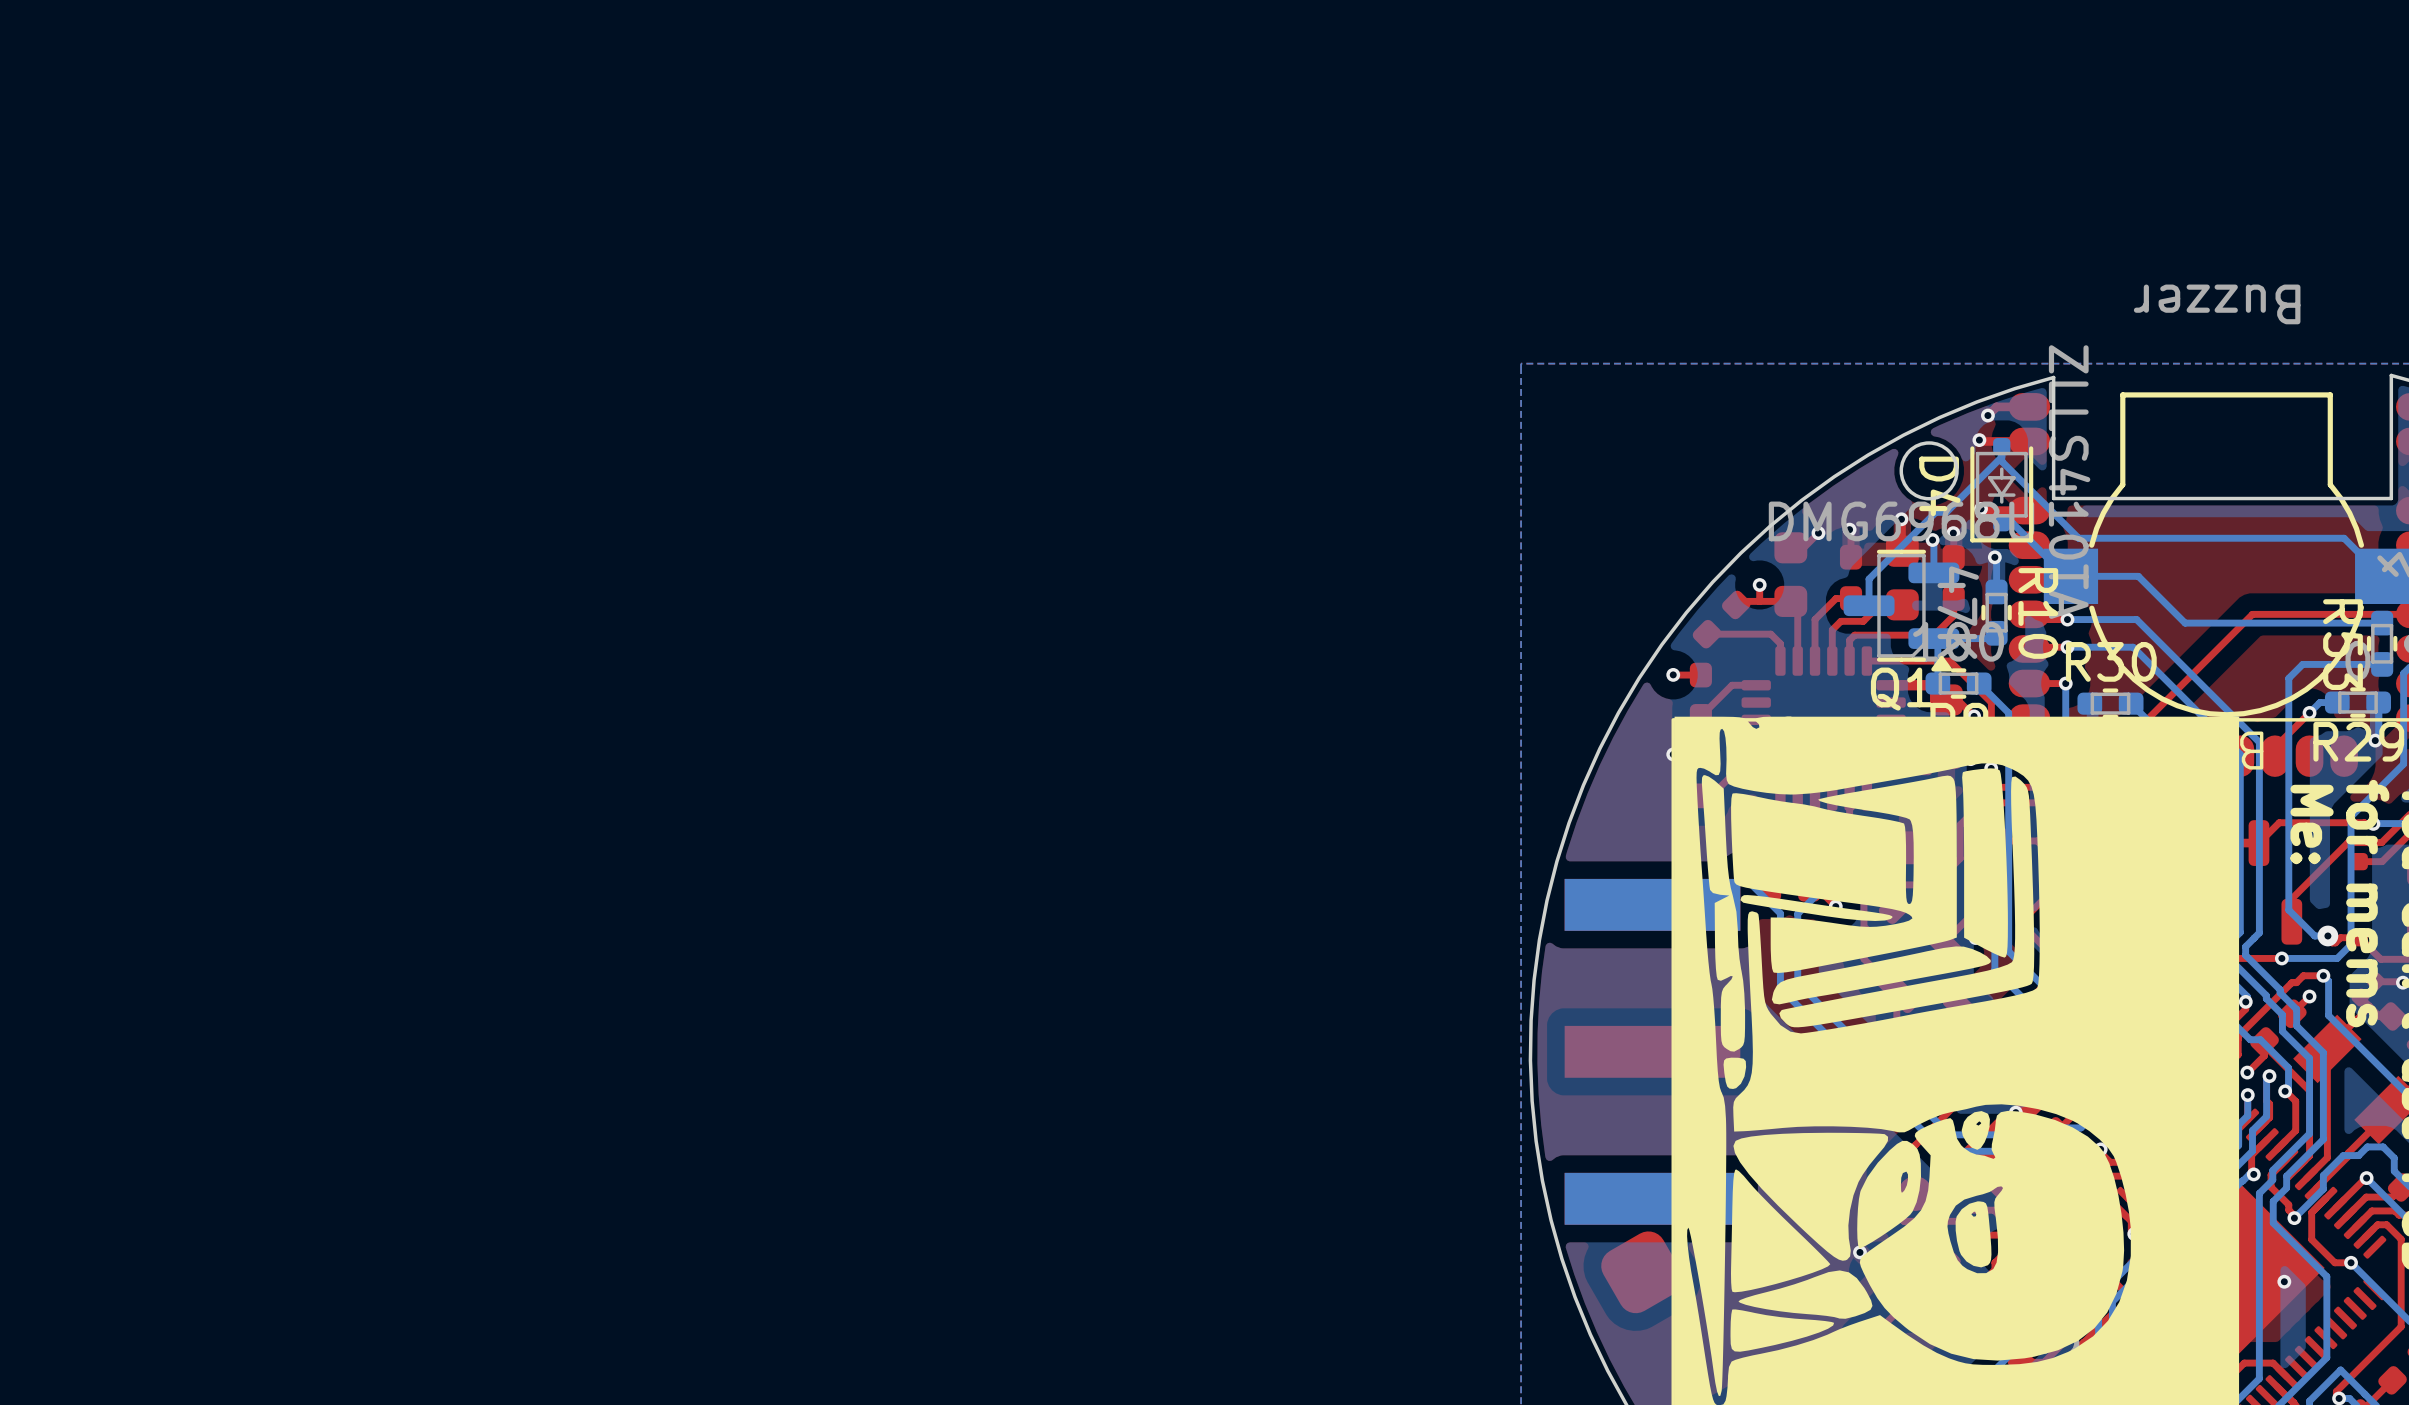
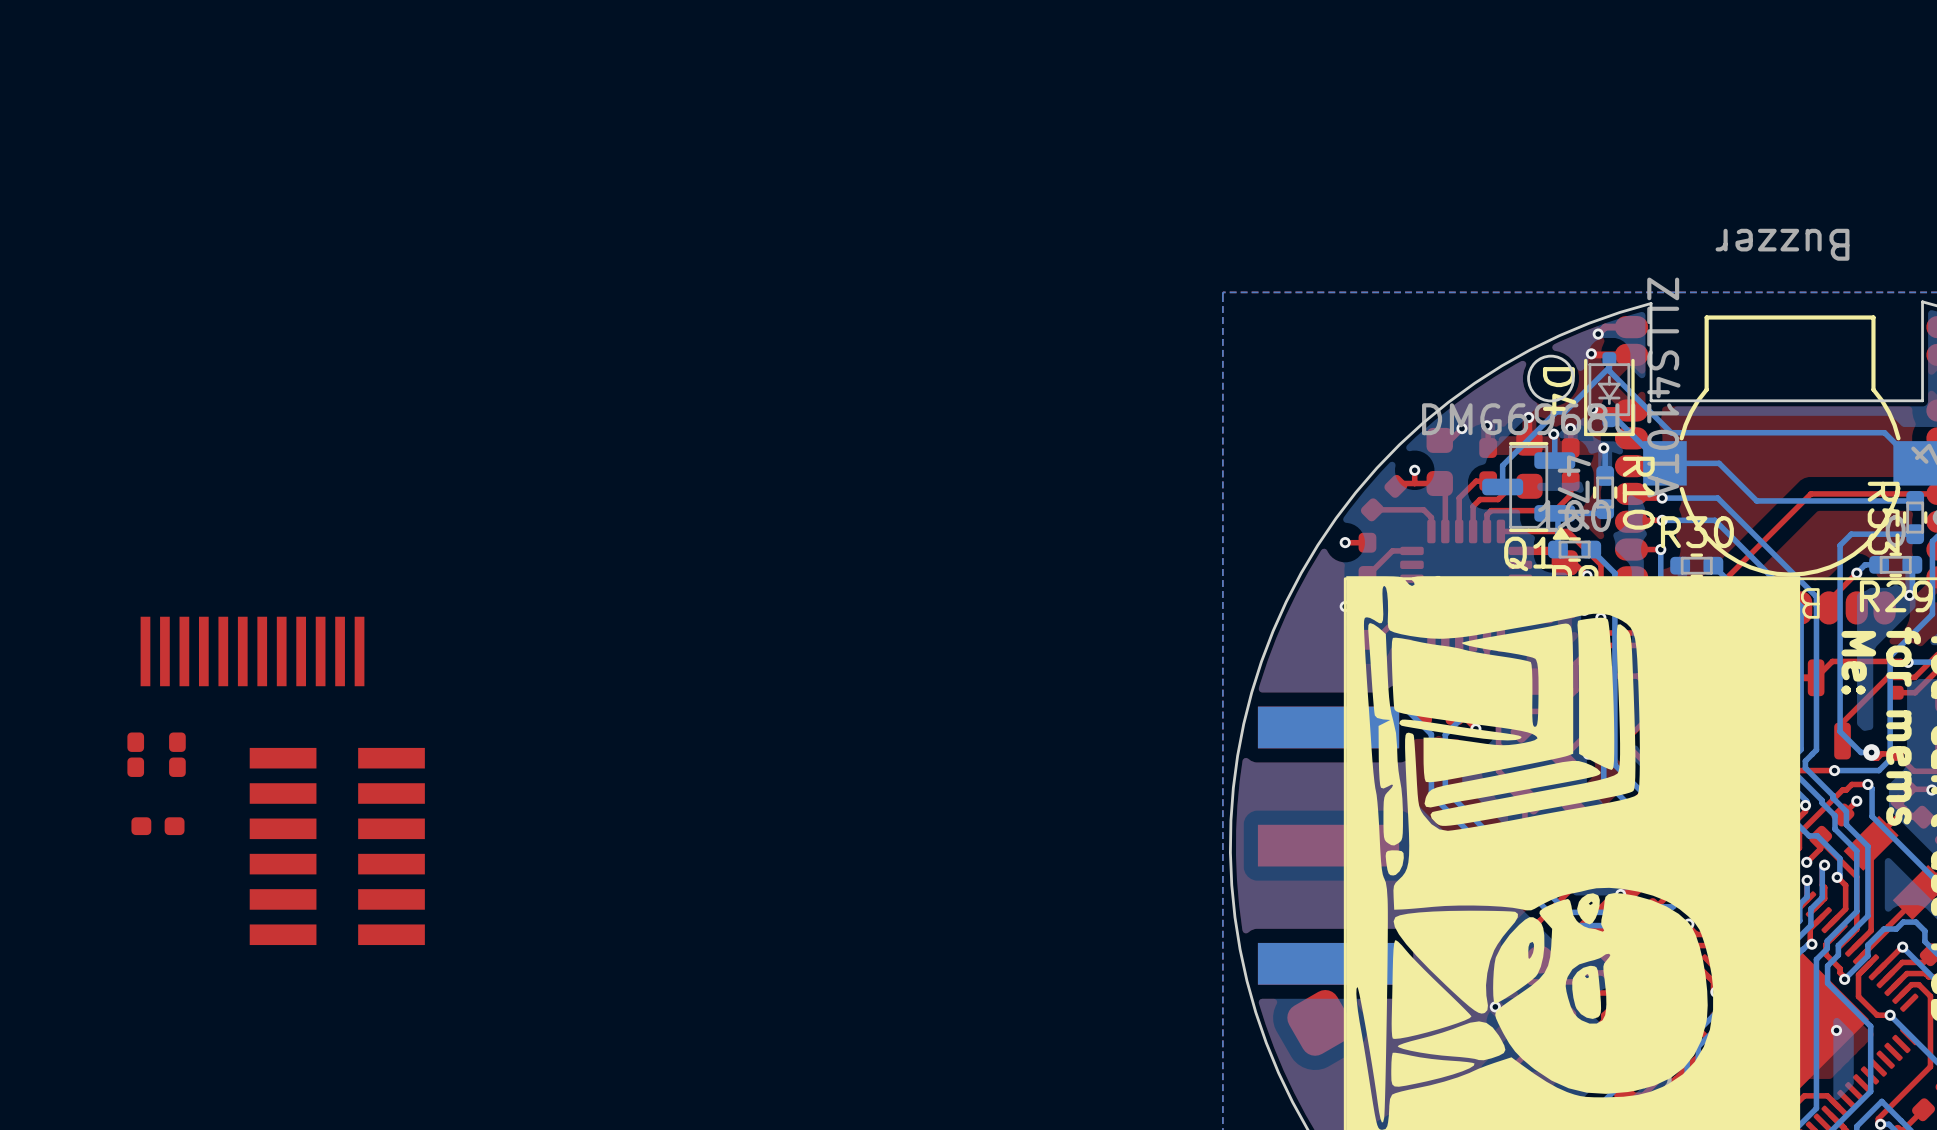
part: none -> (252, 651)
part: none -> (156, 754)
part: none -> (157, 826)
part: none -> (337, 846)

